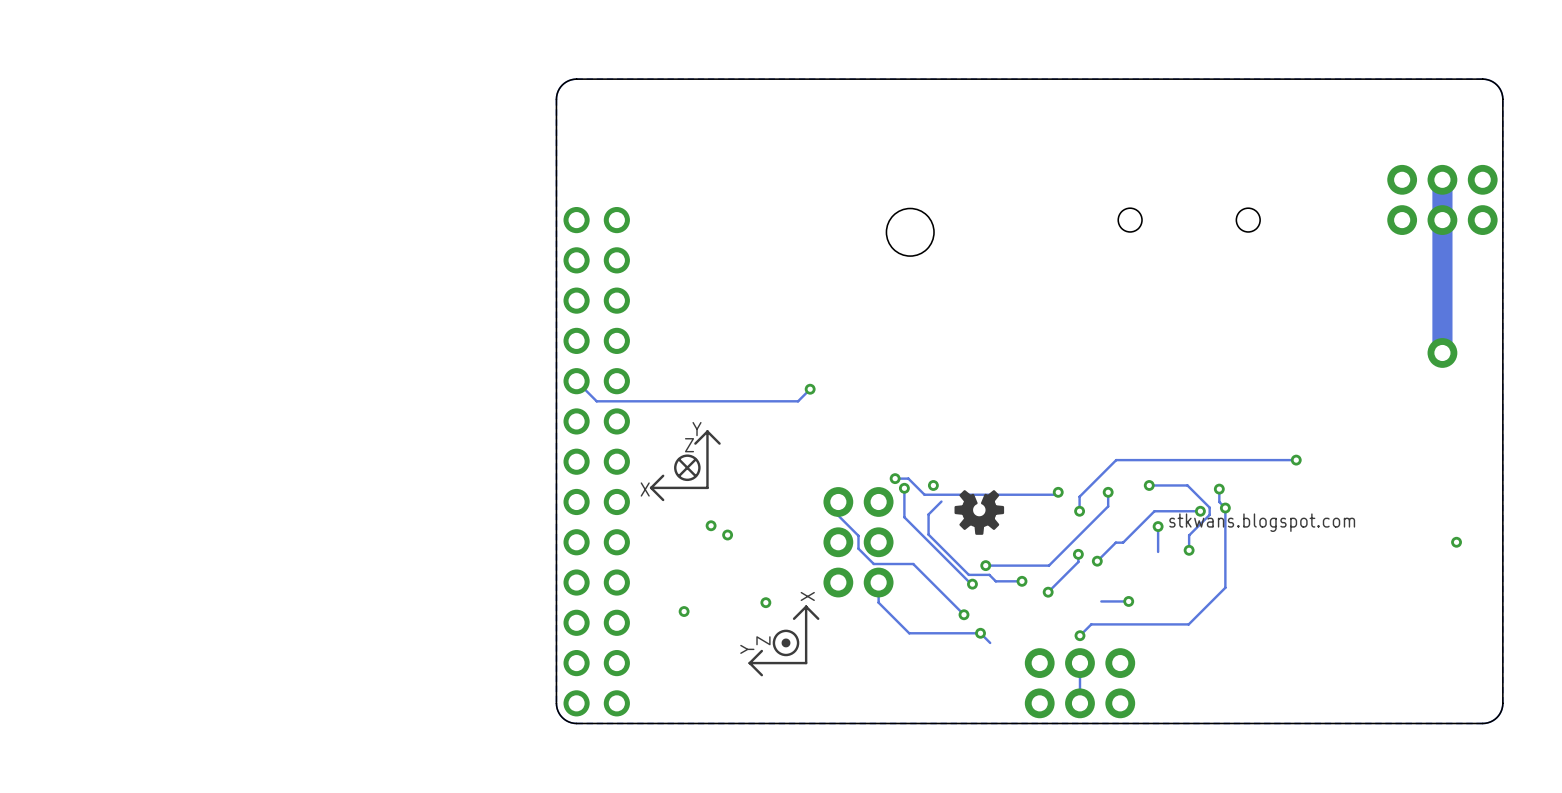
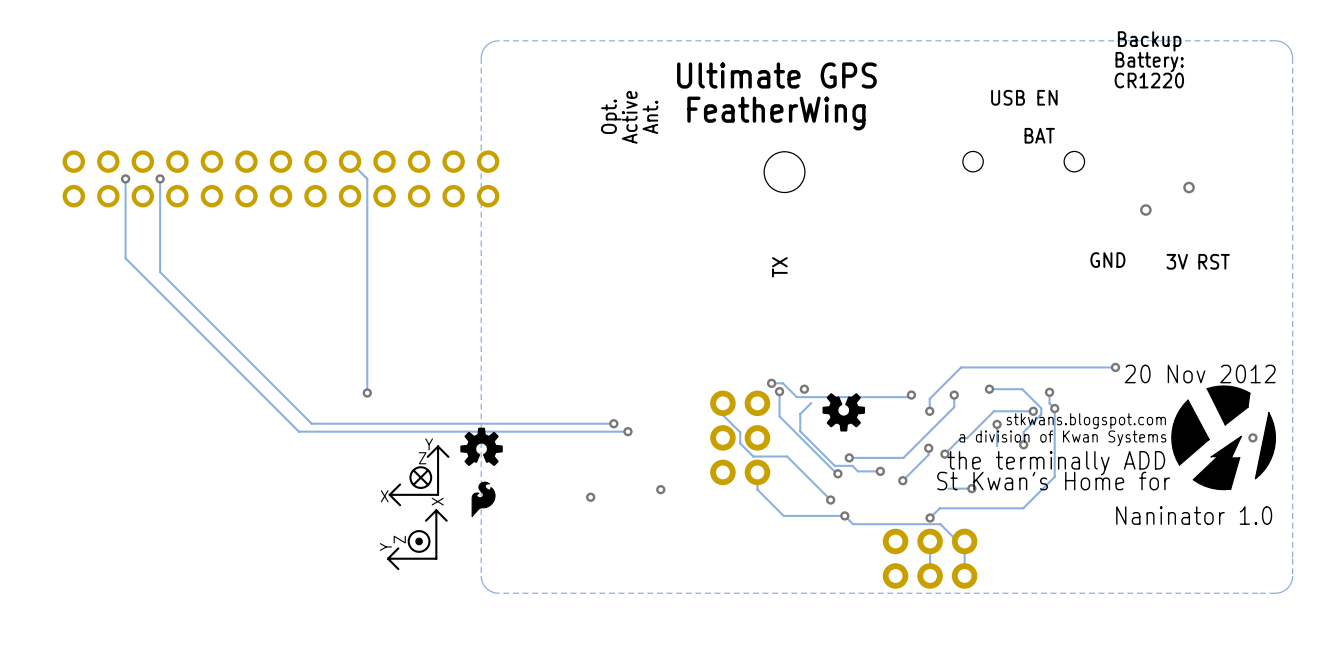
text: none -> Backup (1149, 41)
board edge: (1482, 79) (576, 79) (564, 83) (559, 89) (556, 99) (556, 703) (560, 715) (566, 720) (576, 723) (1482, 723) (1494, 719) (1500, 713) (1502, 703) (1502, 99) (1501, 91) (1496, 85) (1490, 80) (1482, 79) -> none
text: none -> Battery: (1149, 62)
text: none -> Ultimate GPS (776, 75)
text: none -> CR1220 (1149, 80)
text: none -> USB (1008, 97)
text: none -> EN (1047, 97)
text: none -> FeatherWing (776, 113)
text: none -> Opt. (611, 116)
text: none -> Active (629, 117)
text: none -> Ant. (650, 117)
track: (1442, 179) (1442, 352) -> none
part: (1442, 179) -> none
text: none -> BAT (1039, 135)
track: none -> (350, 161) (367, 178) (367, 392)
part: (1442, 220) -> none
track: none -> (125, 178) (125, 258) (298, 431) (627, 431)
via: none -> (125, 178)
track: none -> (160, 178) (160, 272) (311, 423) (613, 423)
via: none -> (160, 178)
via: none -> (1189, 187)
via: none -> (1145, 209)
text: none -> GND (1107, 260)
text: none -> 3V (1177, 261)
text: none -> RST (1214, 261)
text: none -> TX (779, 267)
via: (1442, 352) -> none
track: (576, 381) (596, 401) (798, 401) (810, 389) -> none
via: (810, 389) -> none
part rotation: 0° (596, 461) -> 90° clockwise (280, 178)
part position: (596, 461) -> (280, 178)
drawing position: (685, 465) -> (419, 475)
text: none -> 20 Nov 2012 (1200, 374)
drawing: none -> [1171, 385, 1276, 490]
via: none -> (367, 392)
drawing: none -> [460, 427, 503, 518]
text: none -> a division of Kwan Systems (1062, 438)
text: none -> the terminally ADD (1056, 463)
text: none -> St Kwan's Home for (1053, 481)
text: none -> Naninator 1.0 (1194, 515)
drawing position: (783, 640) -> (417, 539)
track: none -> (853, 524) (940, 524) (957, 541) (964, 541) (964, 575)

